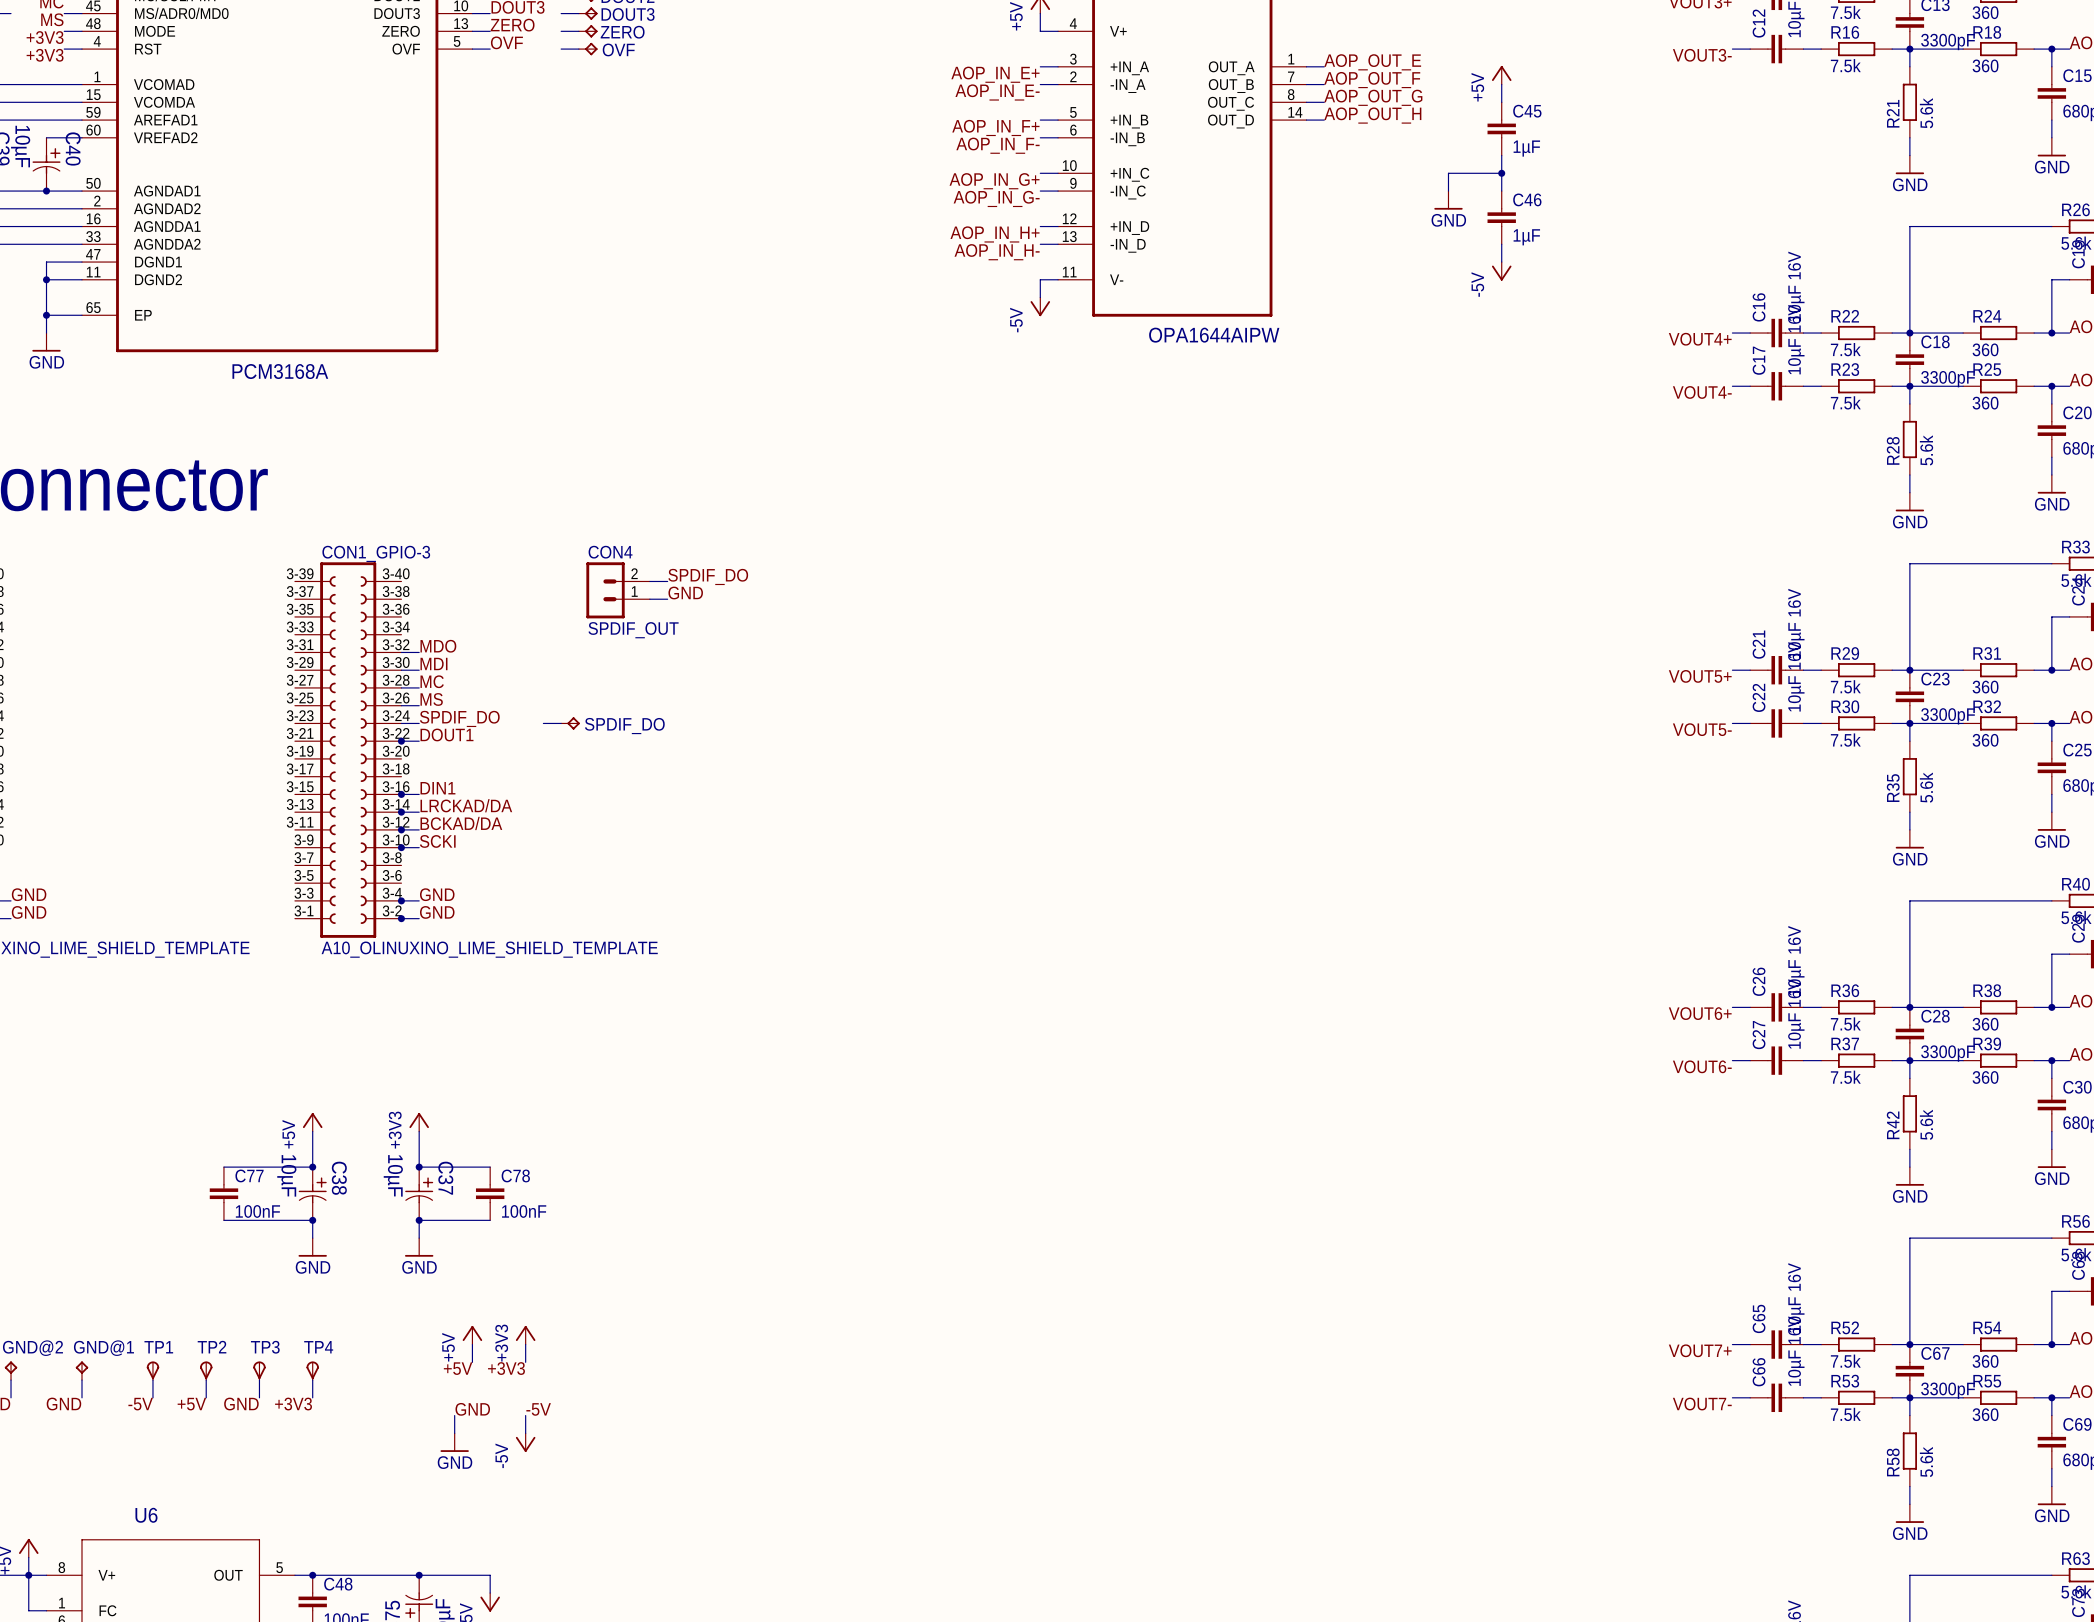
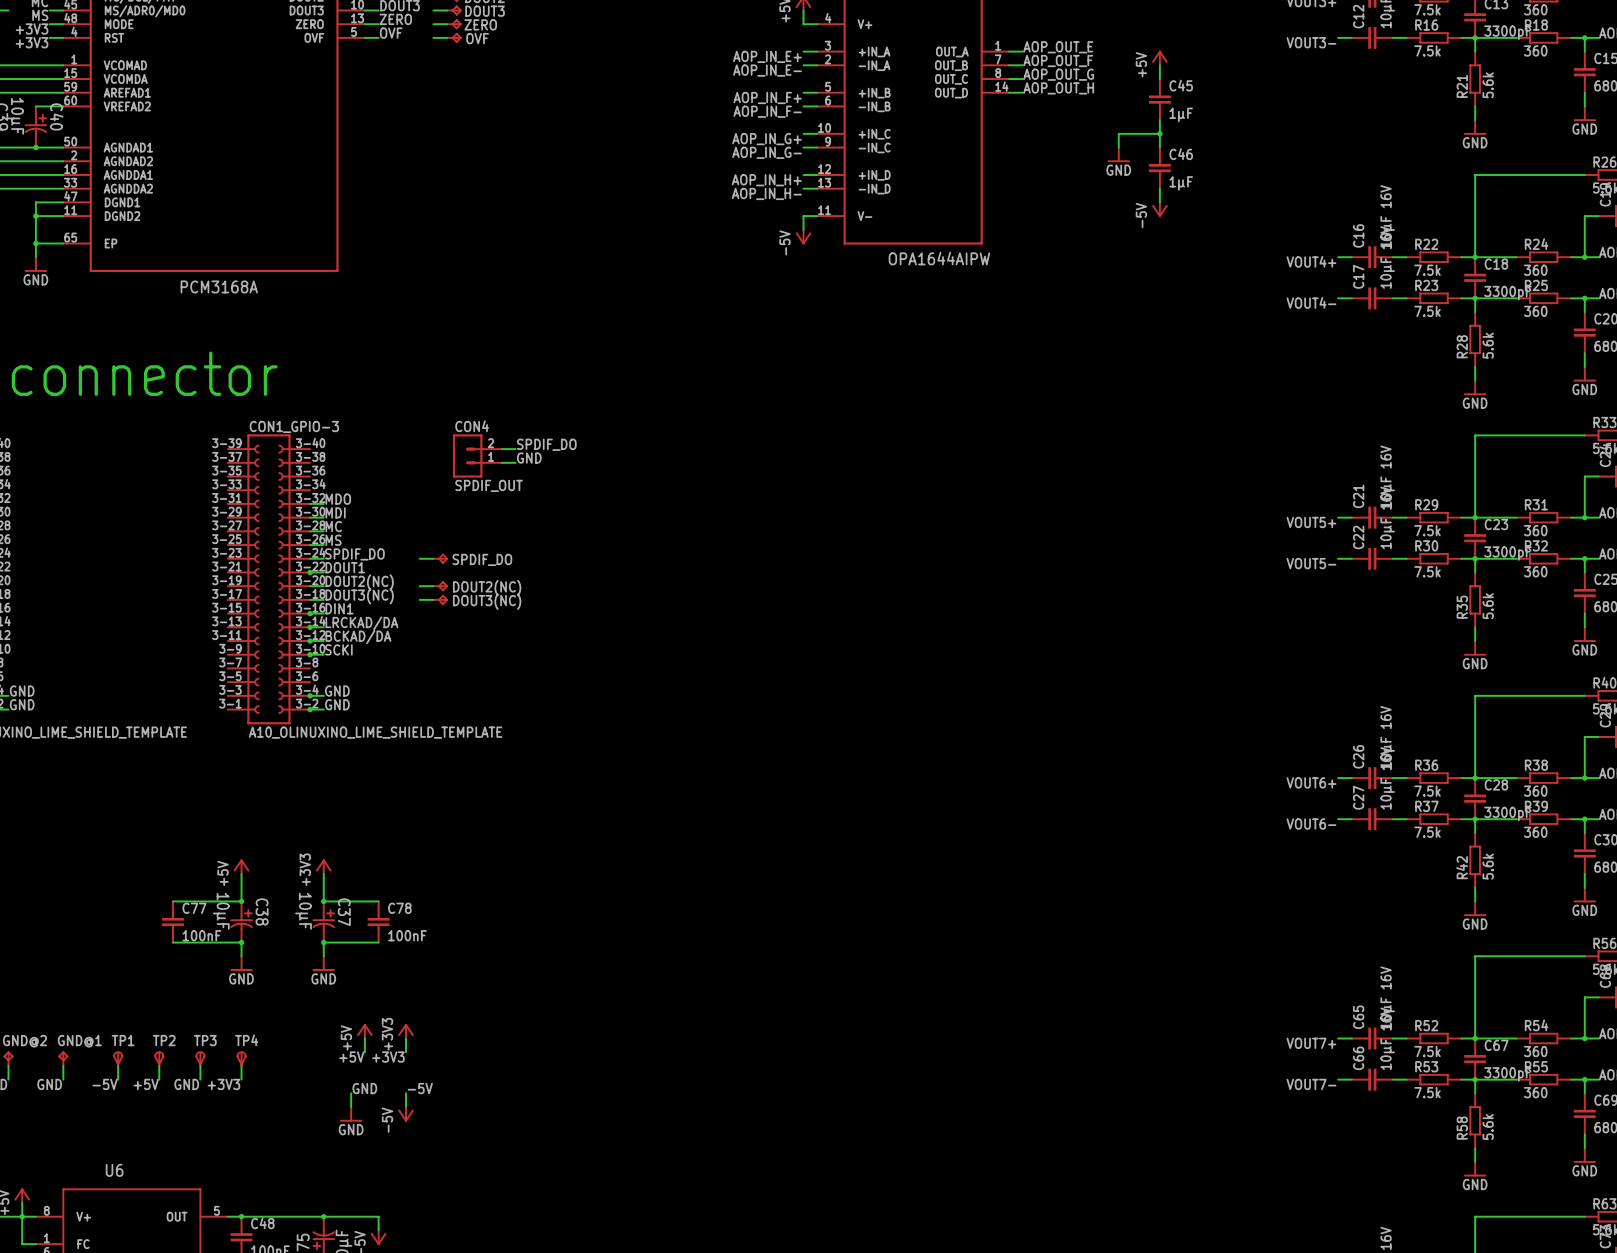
label: none -> DOUT2(NC) (359, 582)
wire: none -> (310, 586) (323, 586)
wire: none -> (419, 586) (433, 586)
DOUT2(NC): none -> (440, 586)
label: none -> DOUT3(NC) (359, 596)
wire: none -> (310, 599) (323, 599)
wire: none -> (419, 599) (433, 599)
DOUT3(NC): none -> (440, 599)

